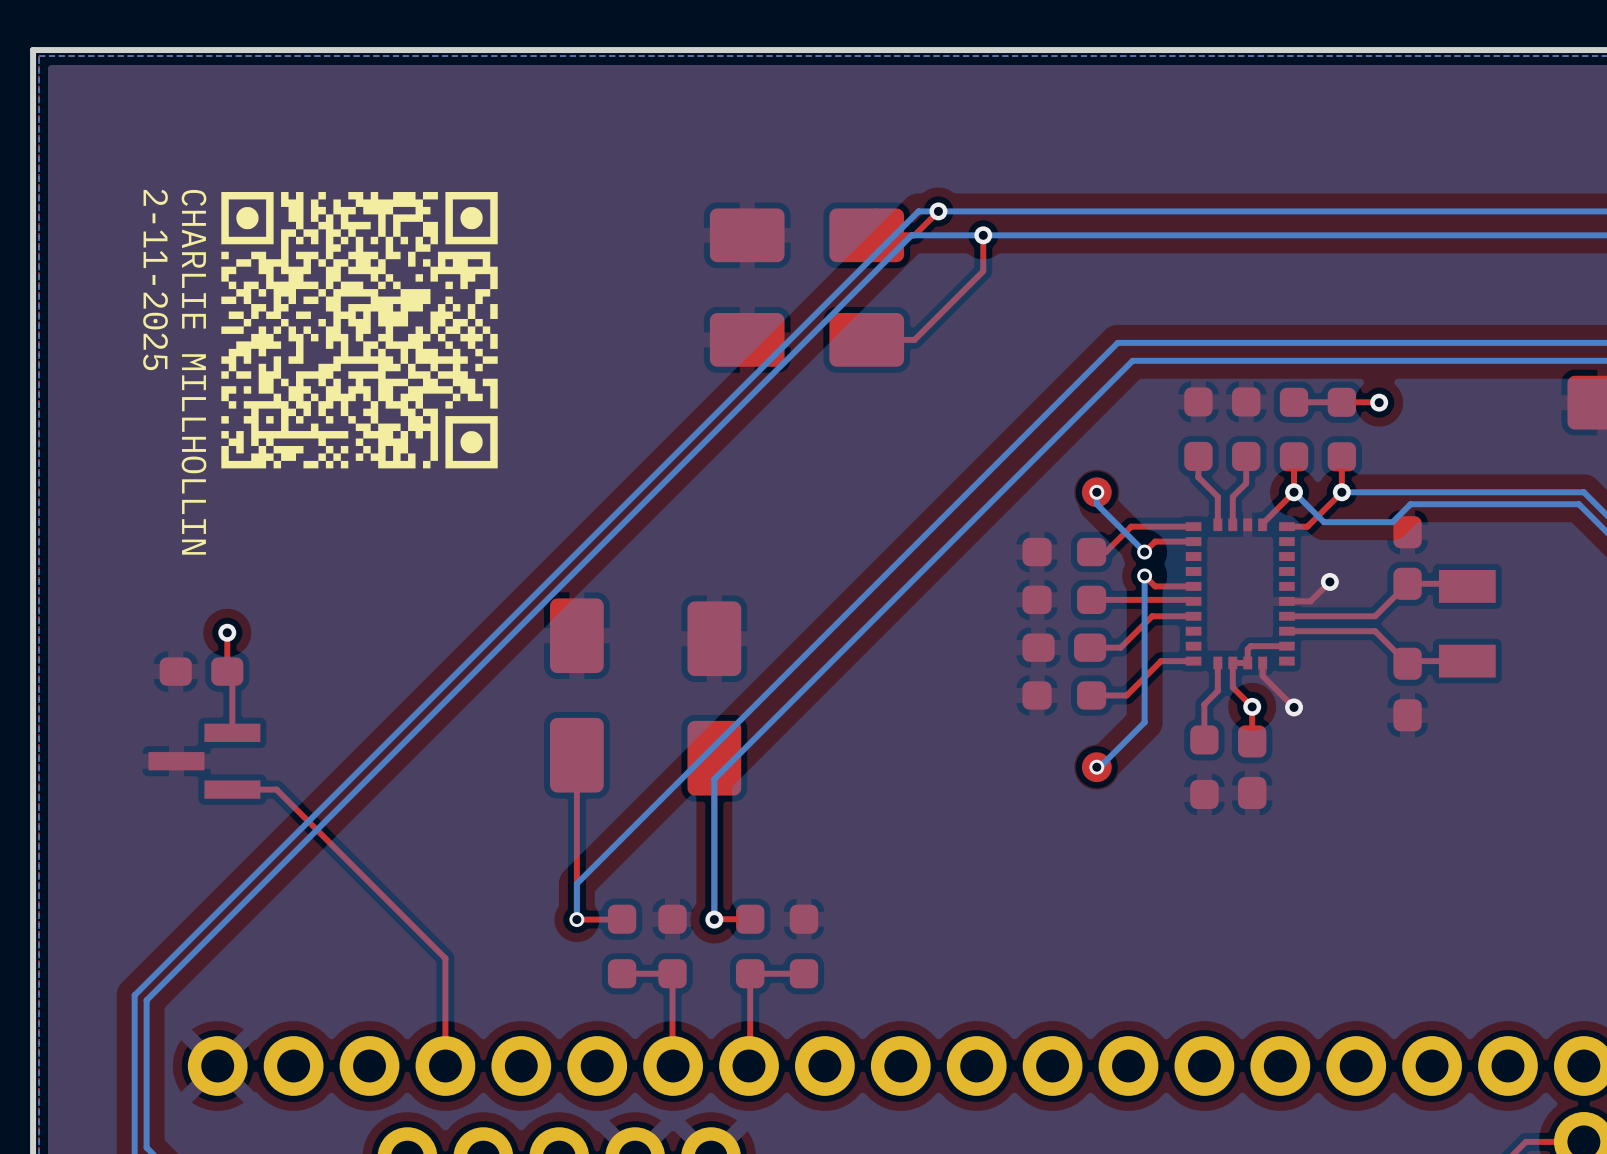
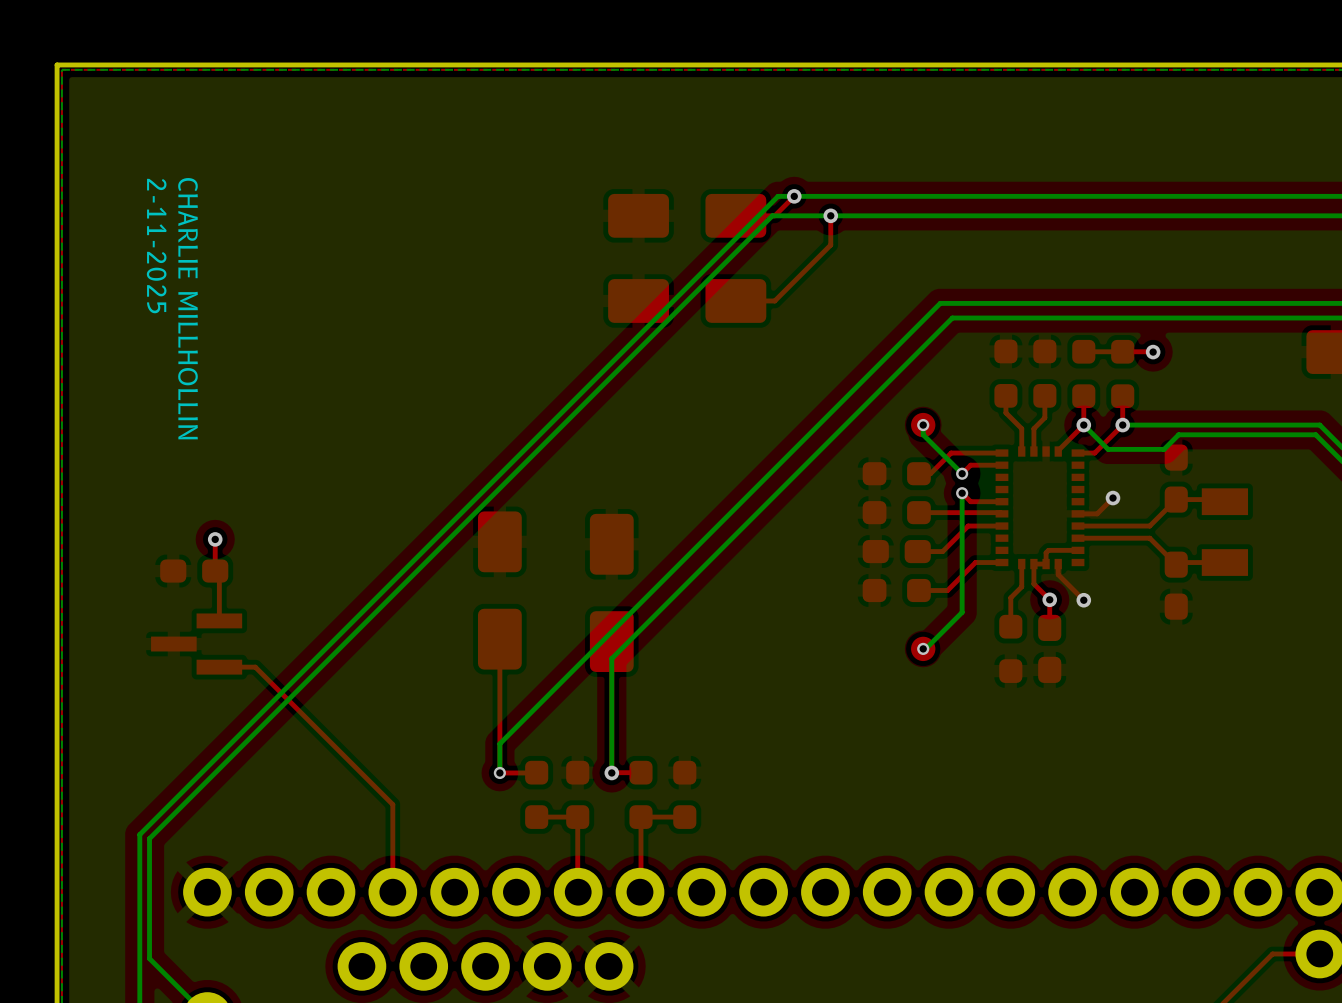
drawing: [221, 191, 498, 469] -> none

